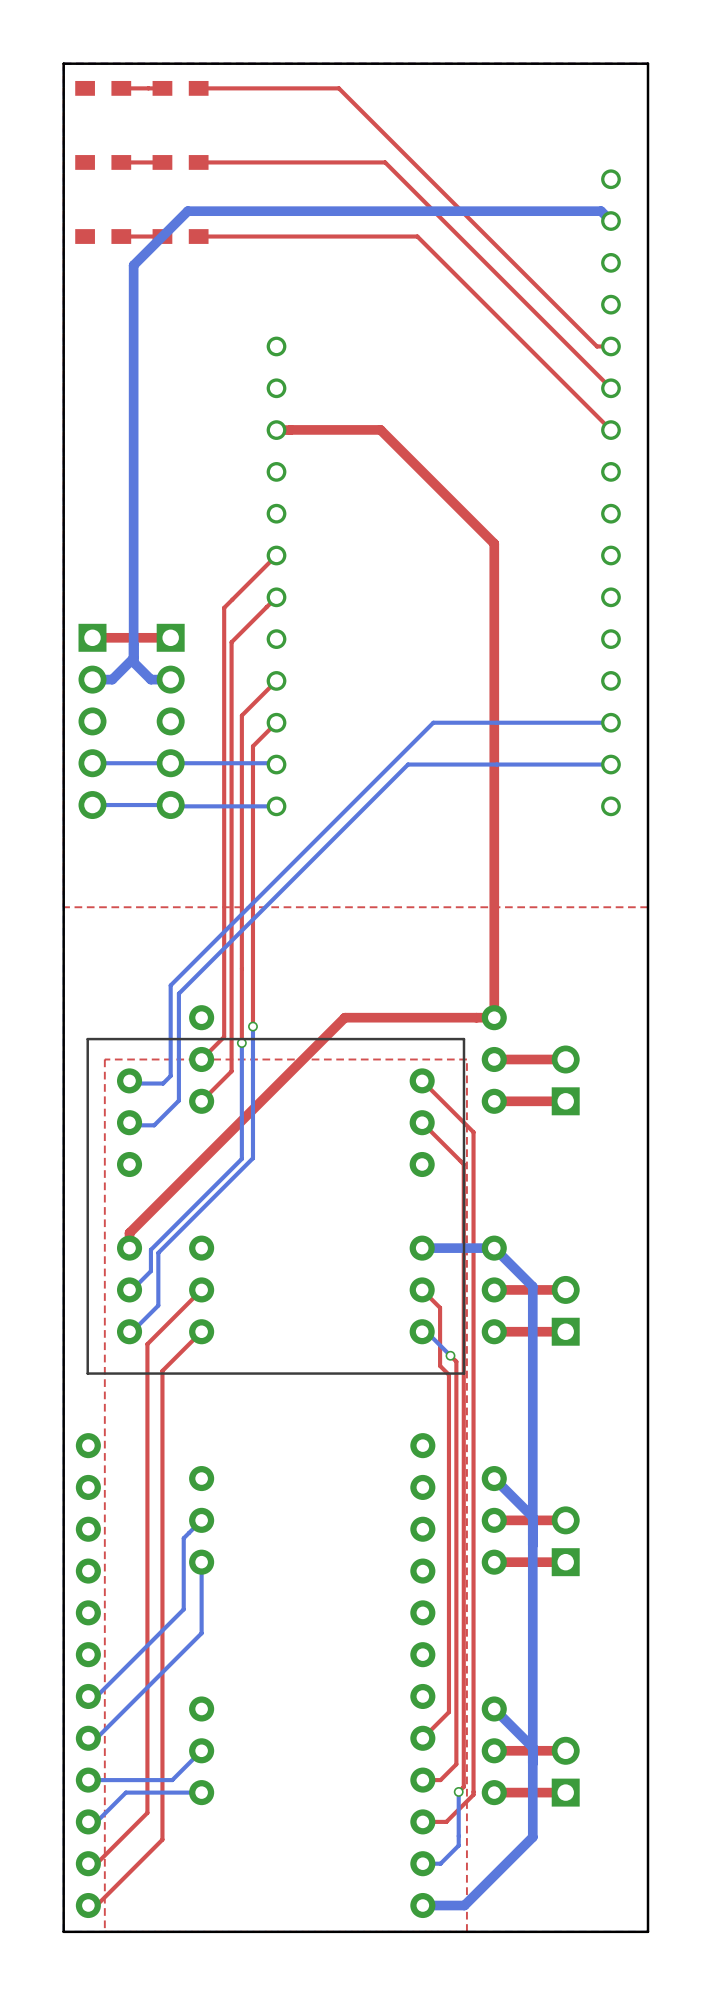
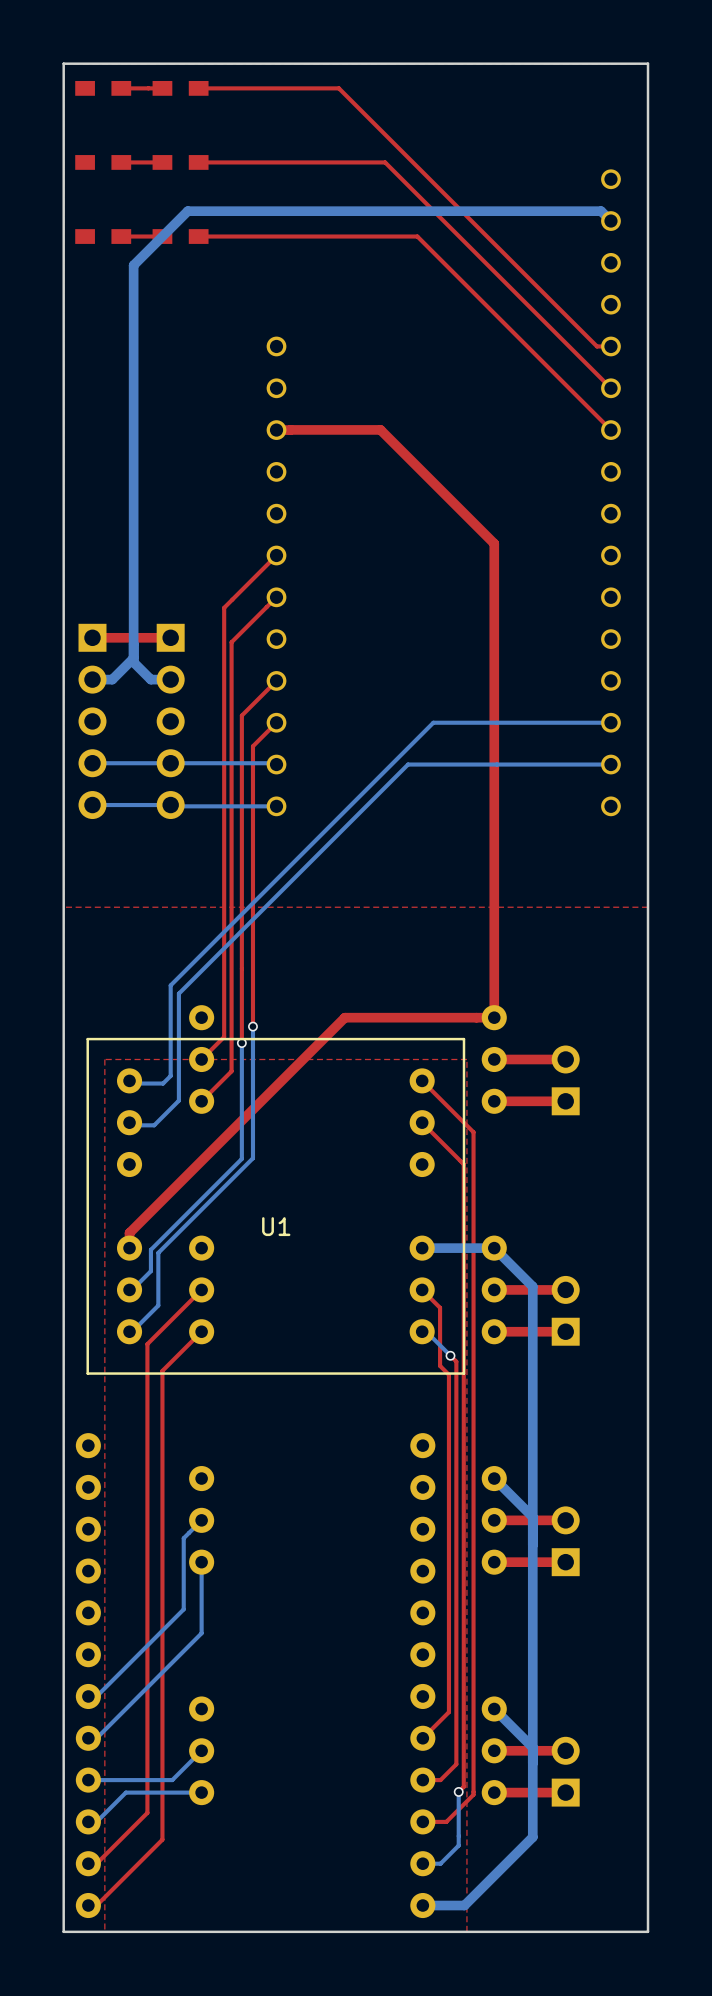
U1 name: none -> U1 (276, 1226)

